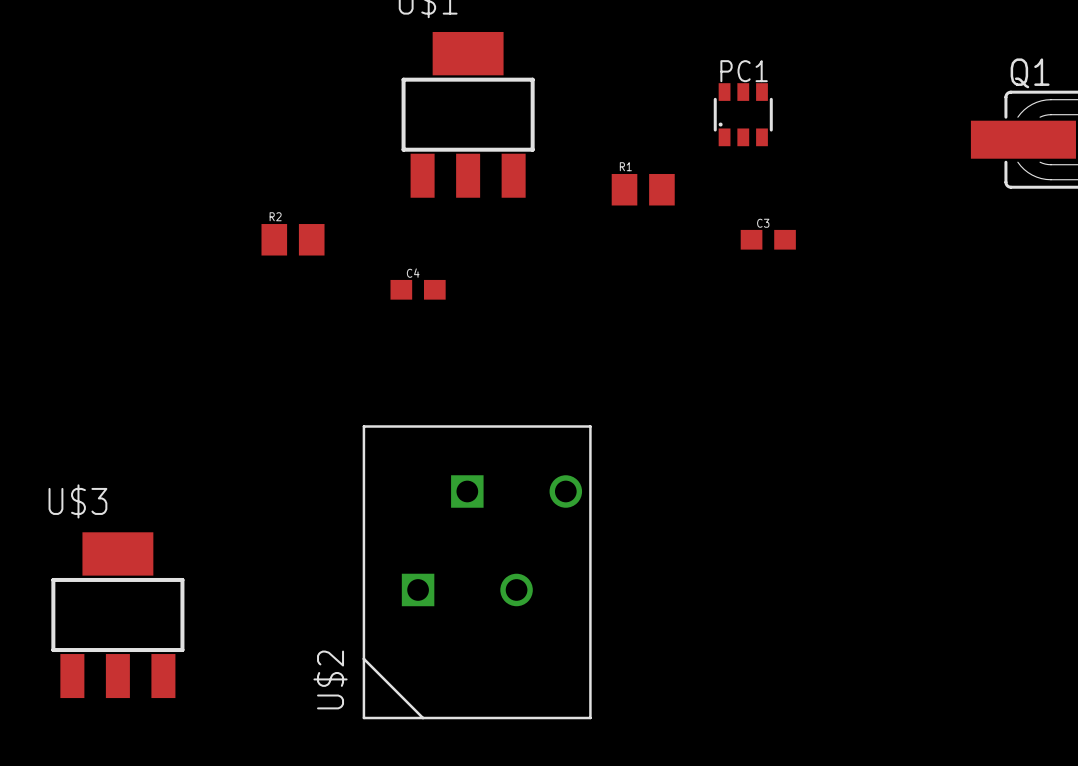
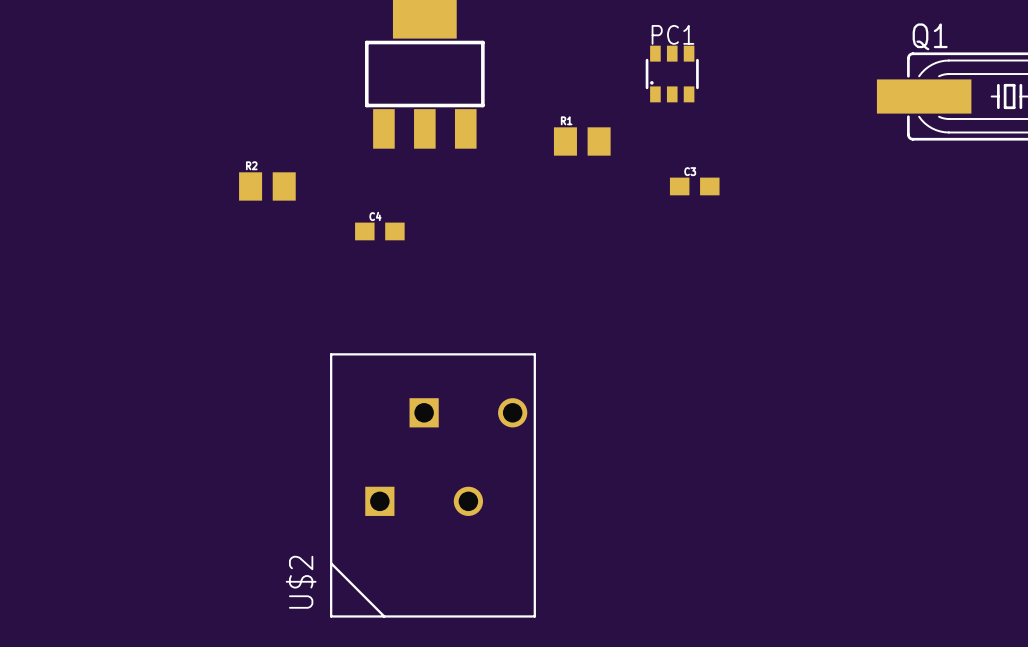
U$3: (117, 615) -> none

